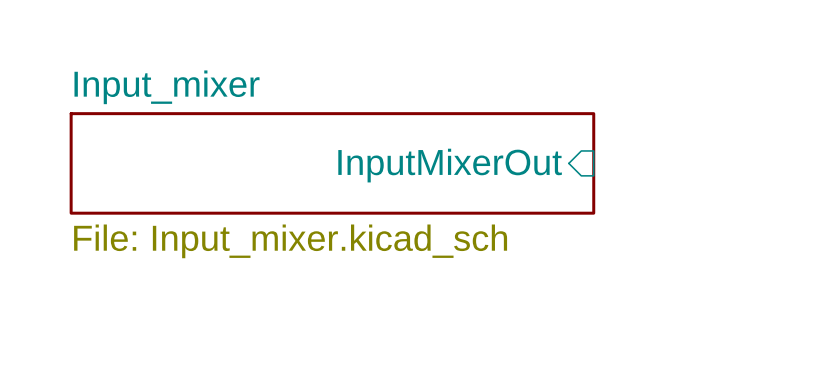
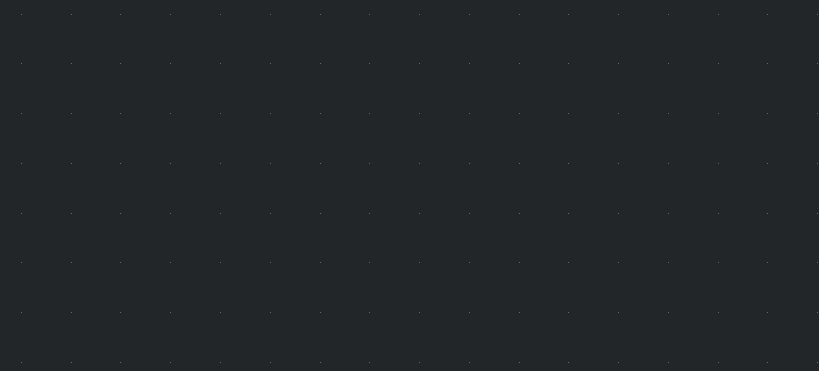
sheet Input_mixer: File: Input_mixer.kicad_sch (332, 163) -> none
sheet pin: InputMixerOut (450, 165) -> none

